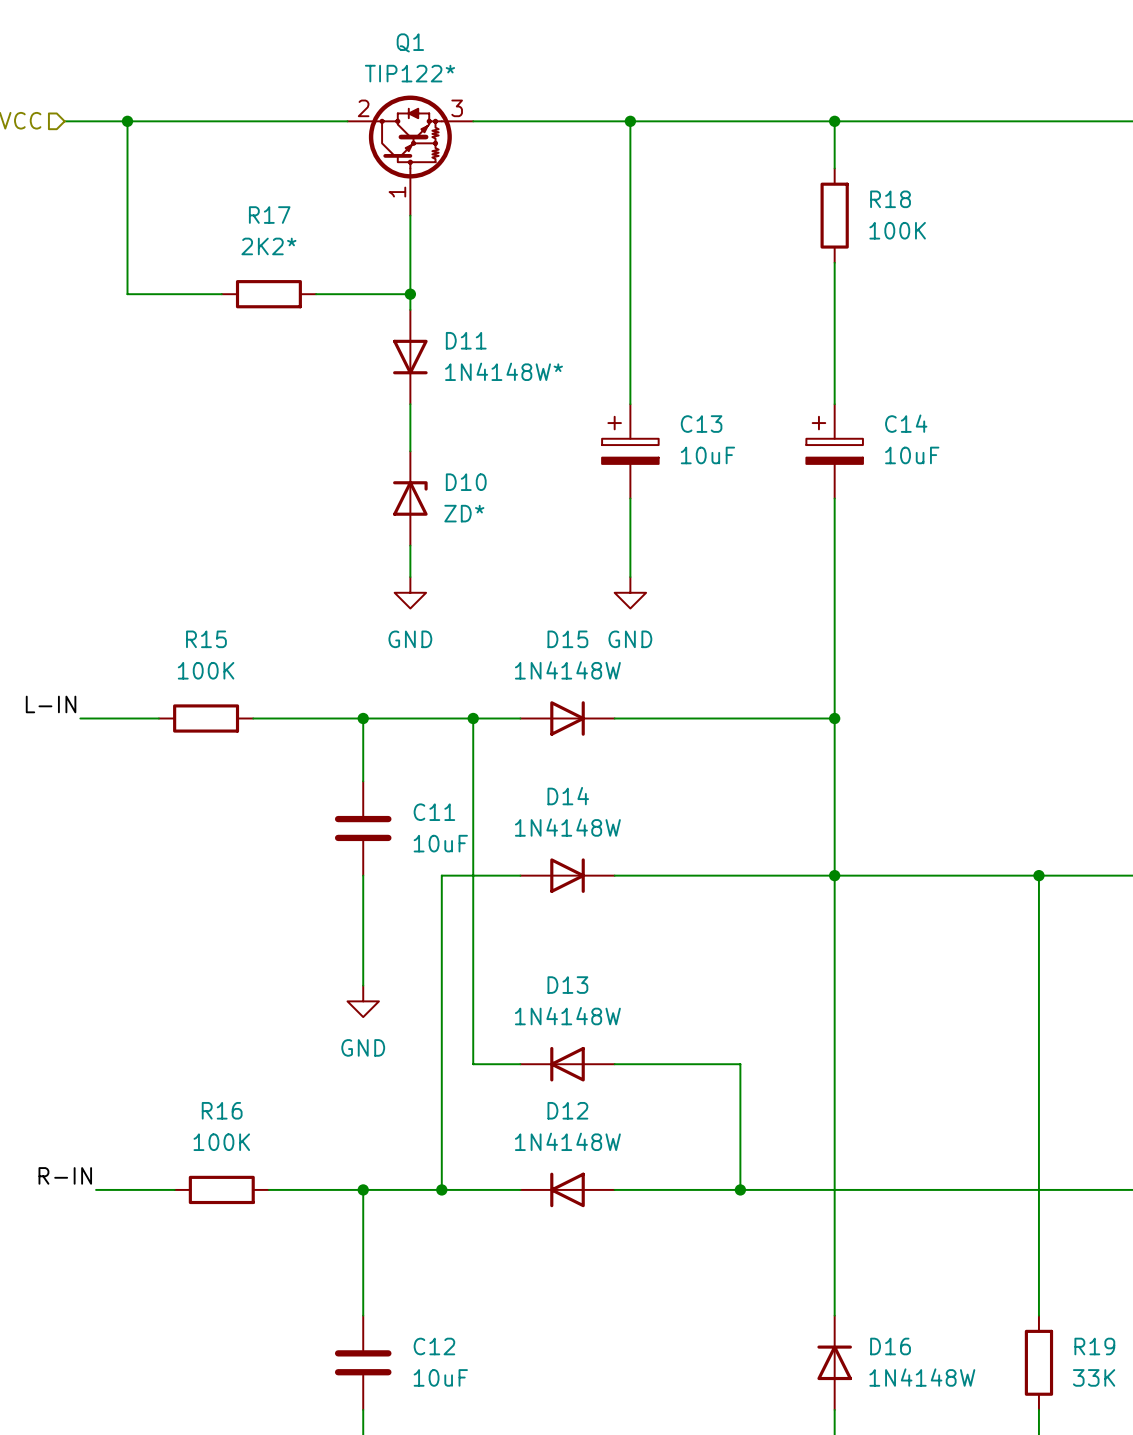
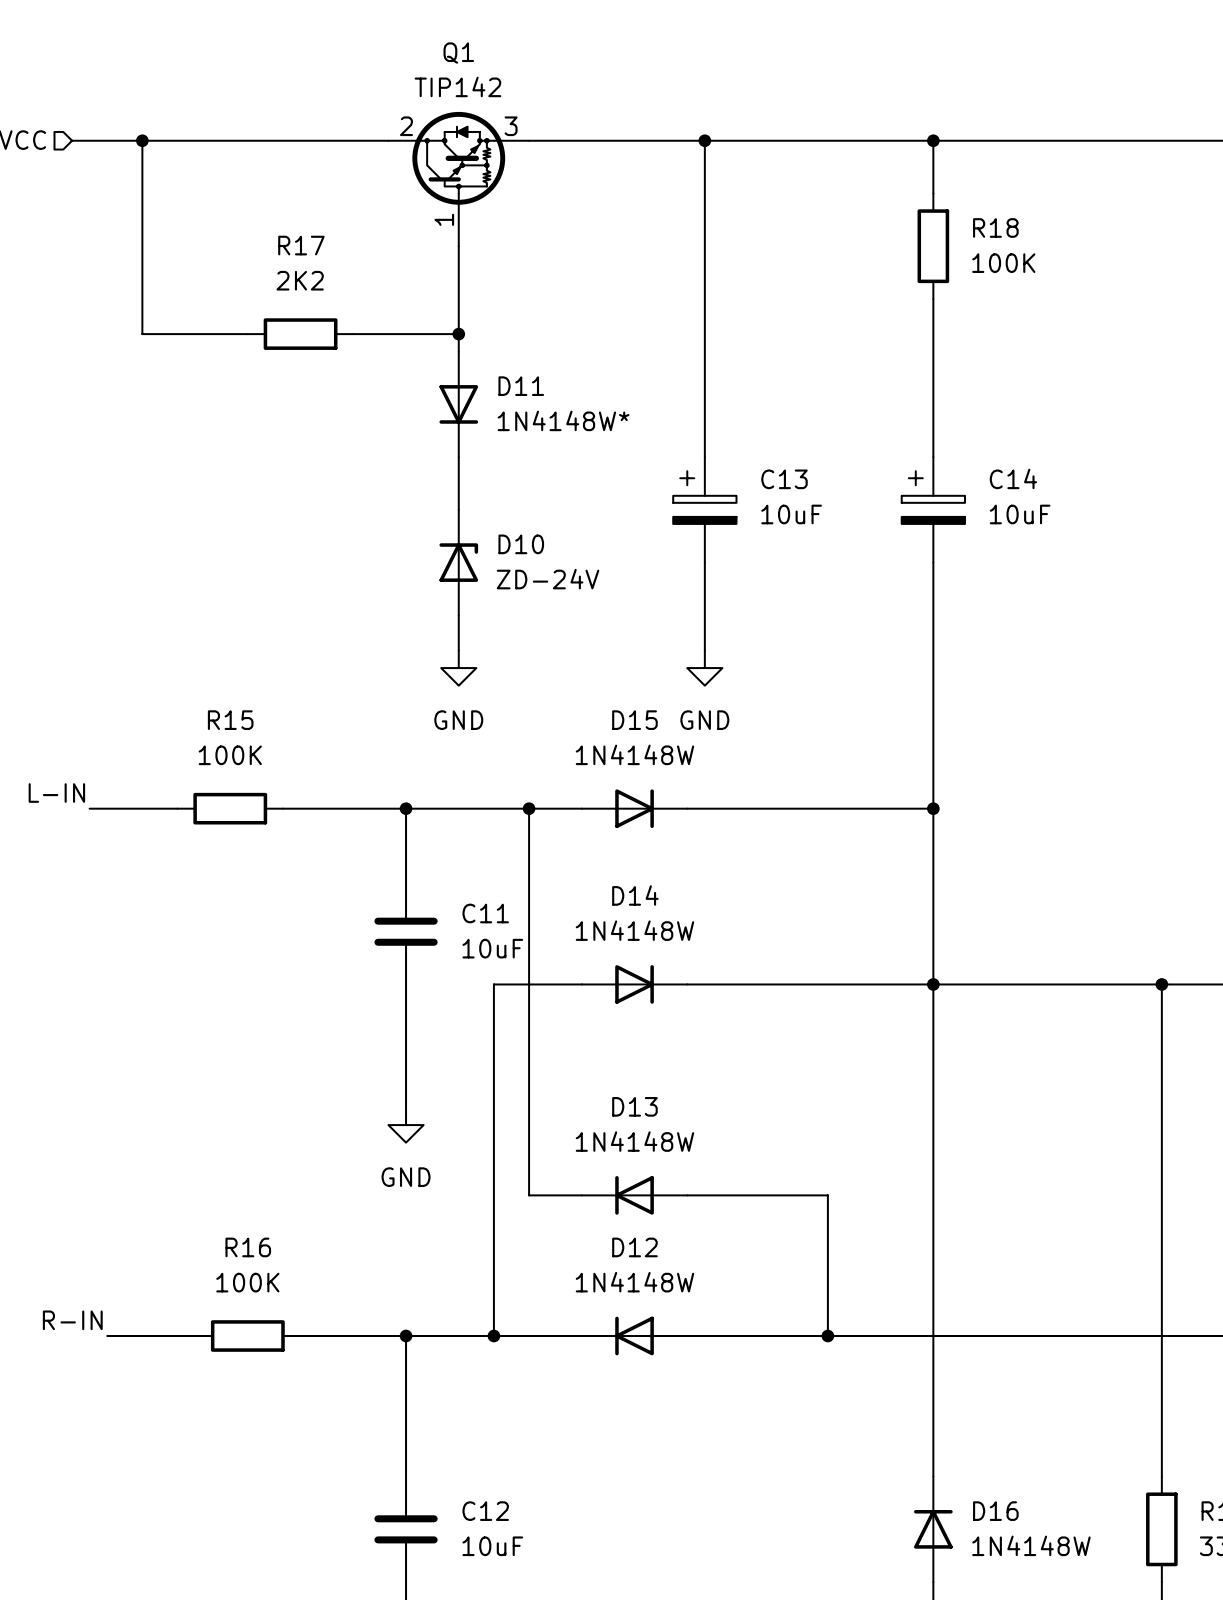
Q1 value: TIP122* (409, 73) -> TIP142 (457, 86)
R17 value: 2K2* (268, 246) -> 2K2 (300, 280)
D10 value: ZD* (464, 513) -> ZD-24V (548, 579)

